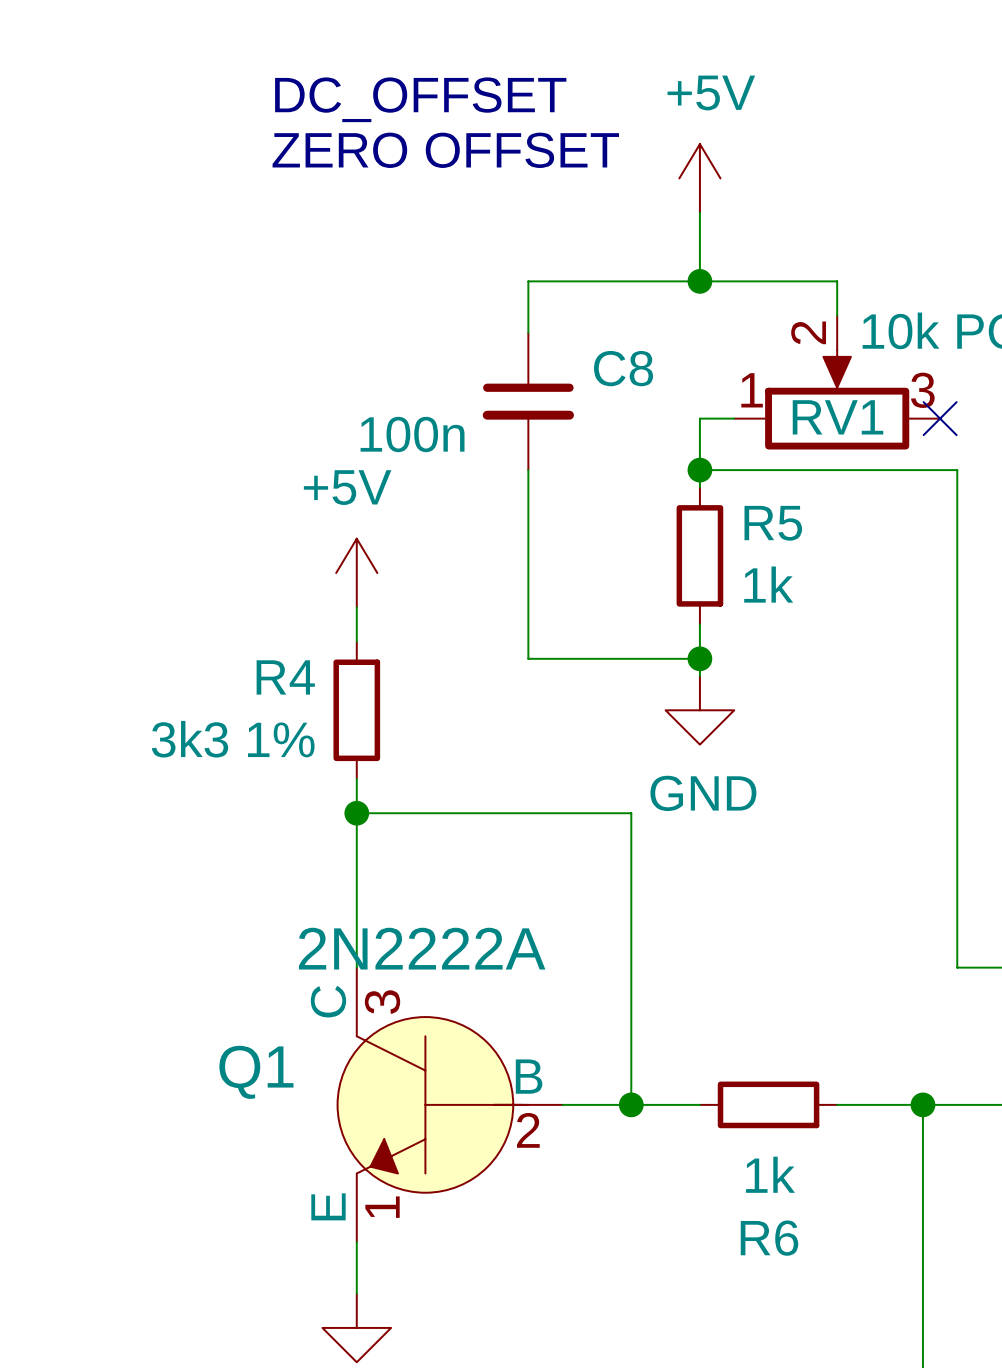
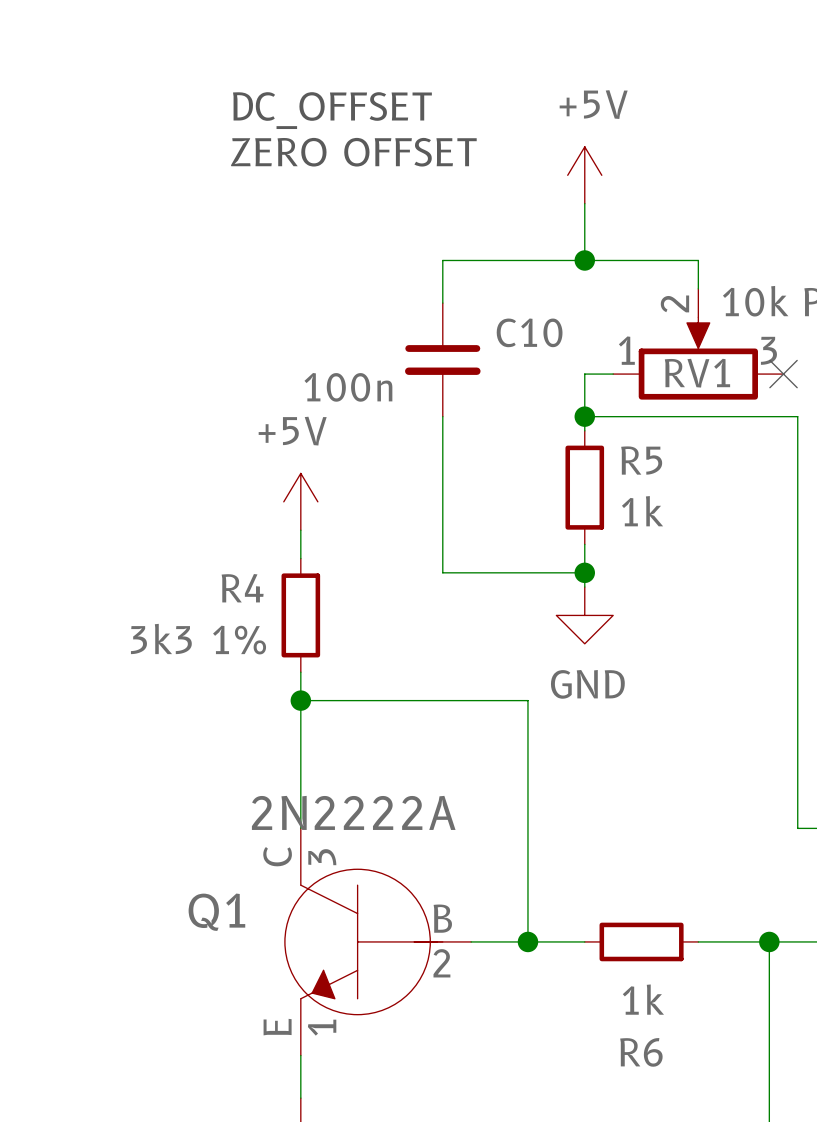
C8 name: C8 (623, 368) -> C10 (529, 332)

